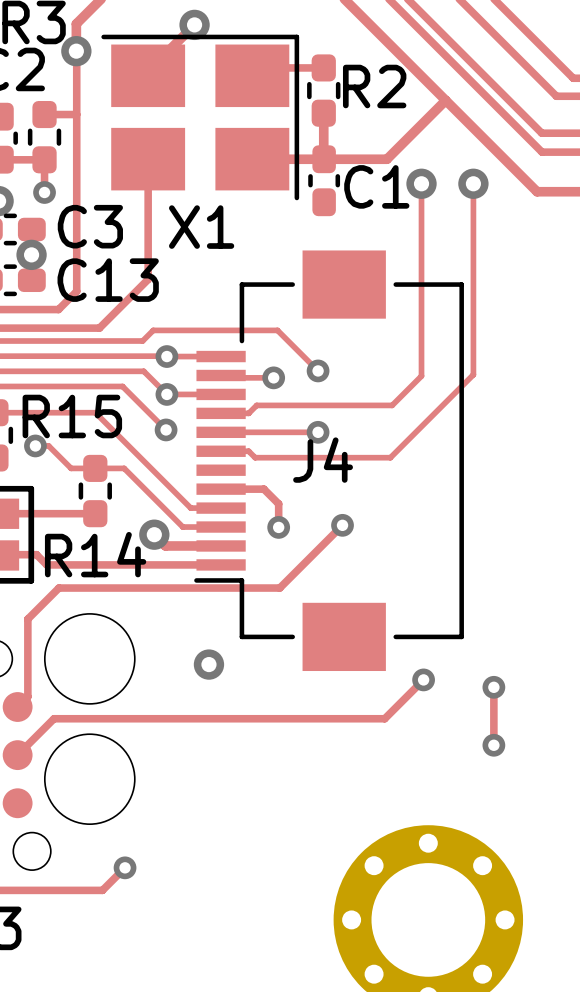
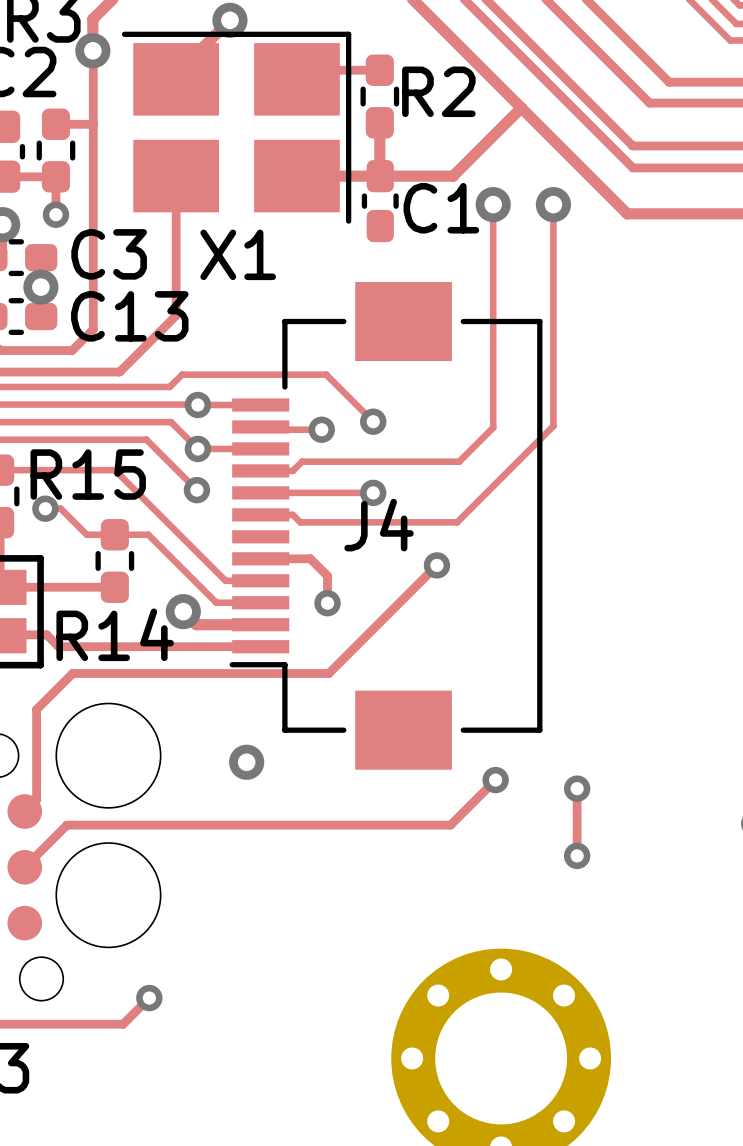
track: none -> (436, 565) (401, 600)
via position: (342, 525) -> (436, 565)

